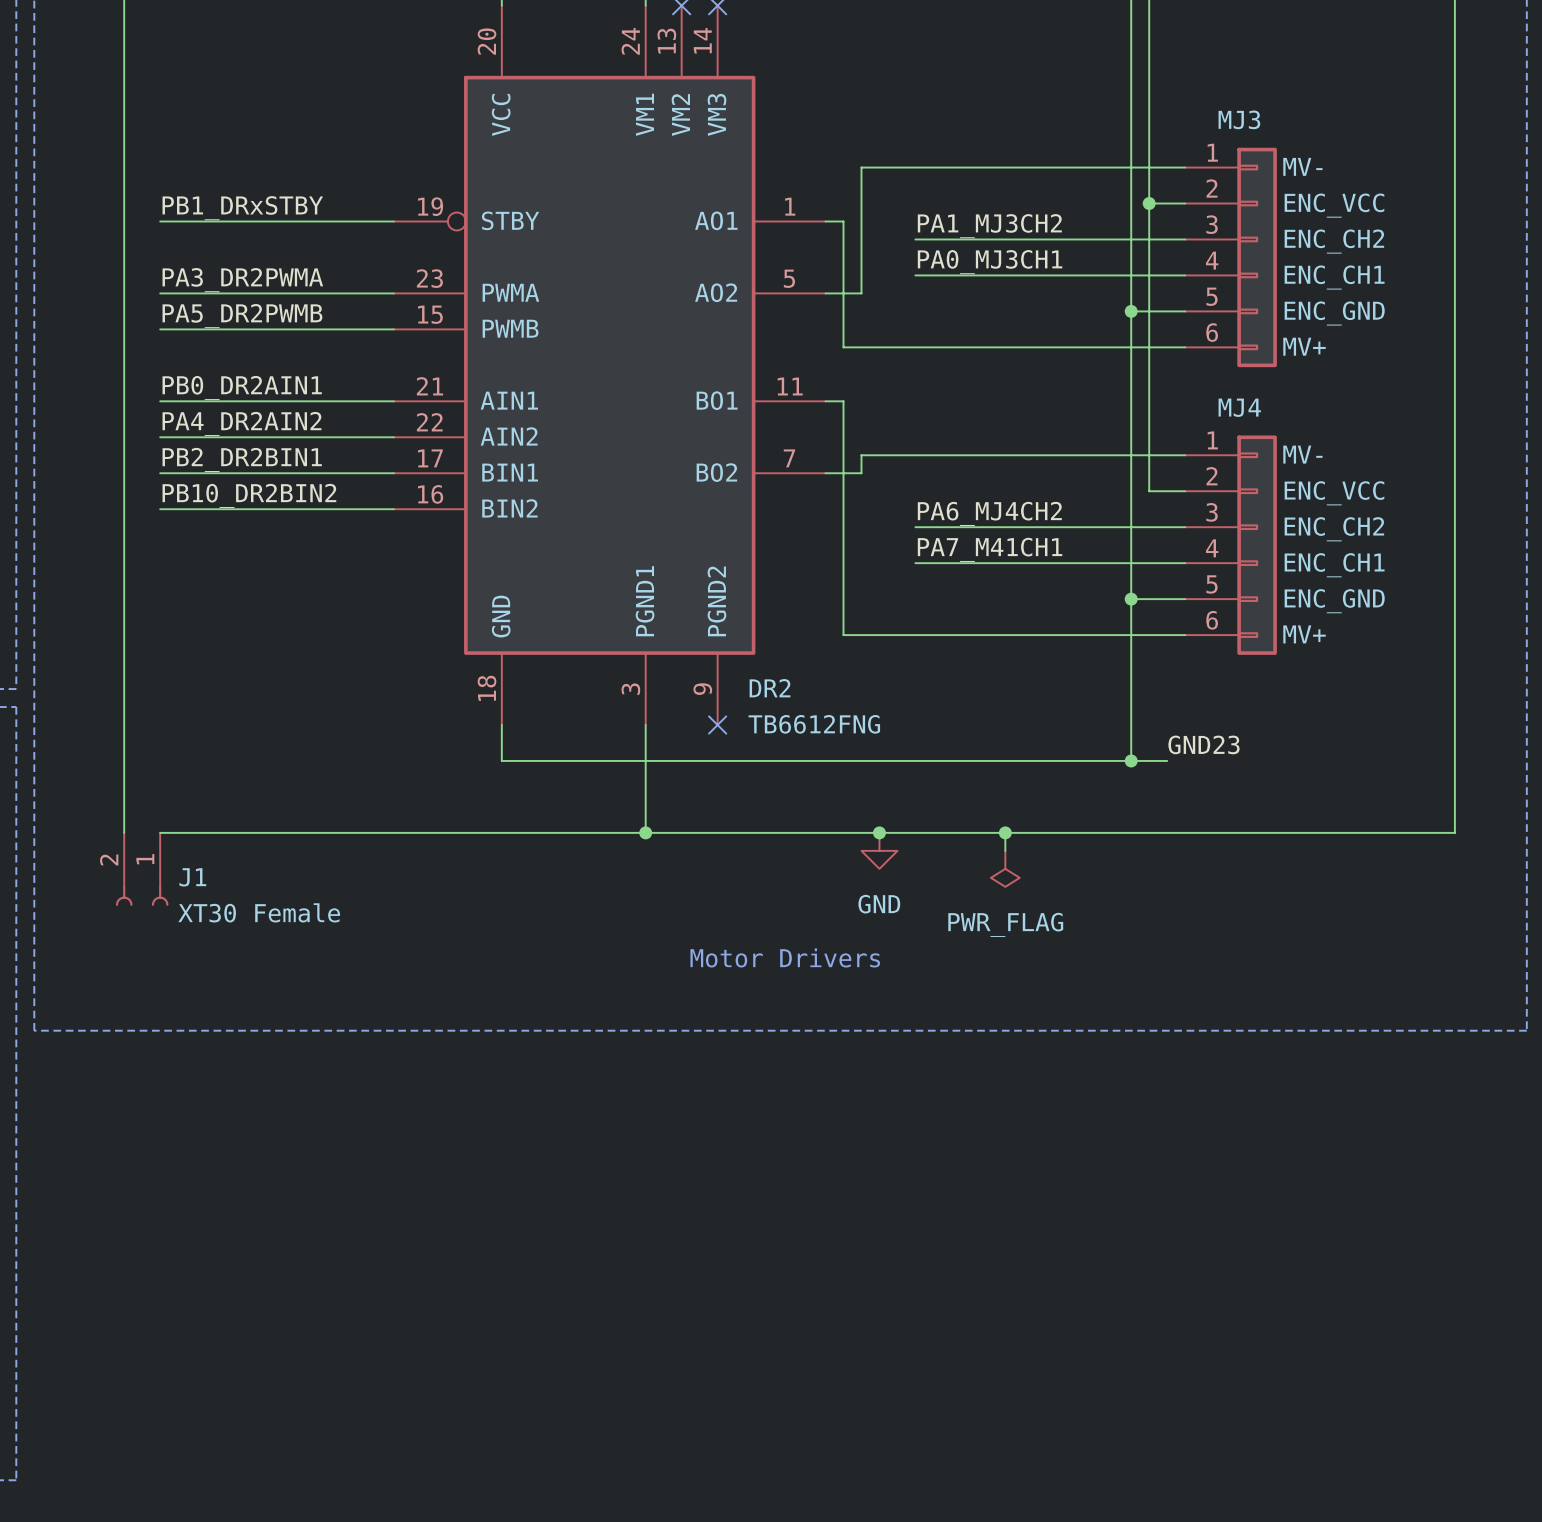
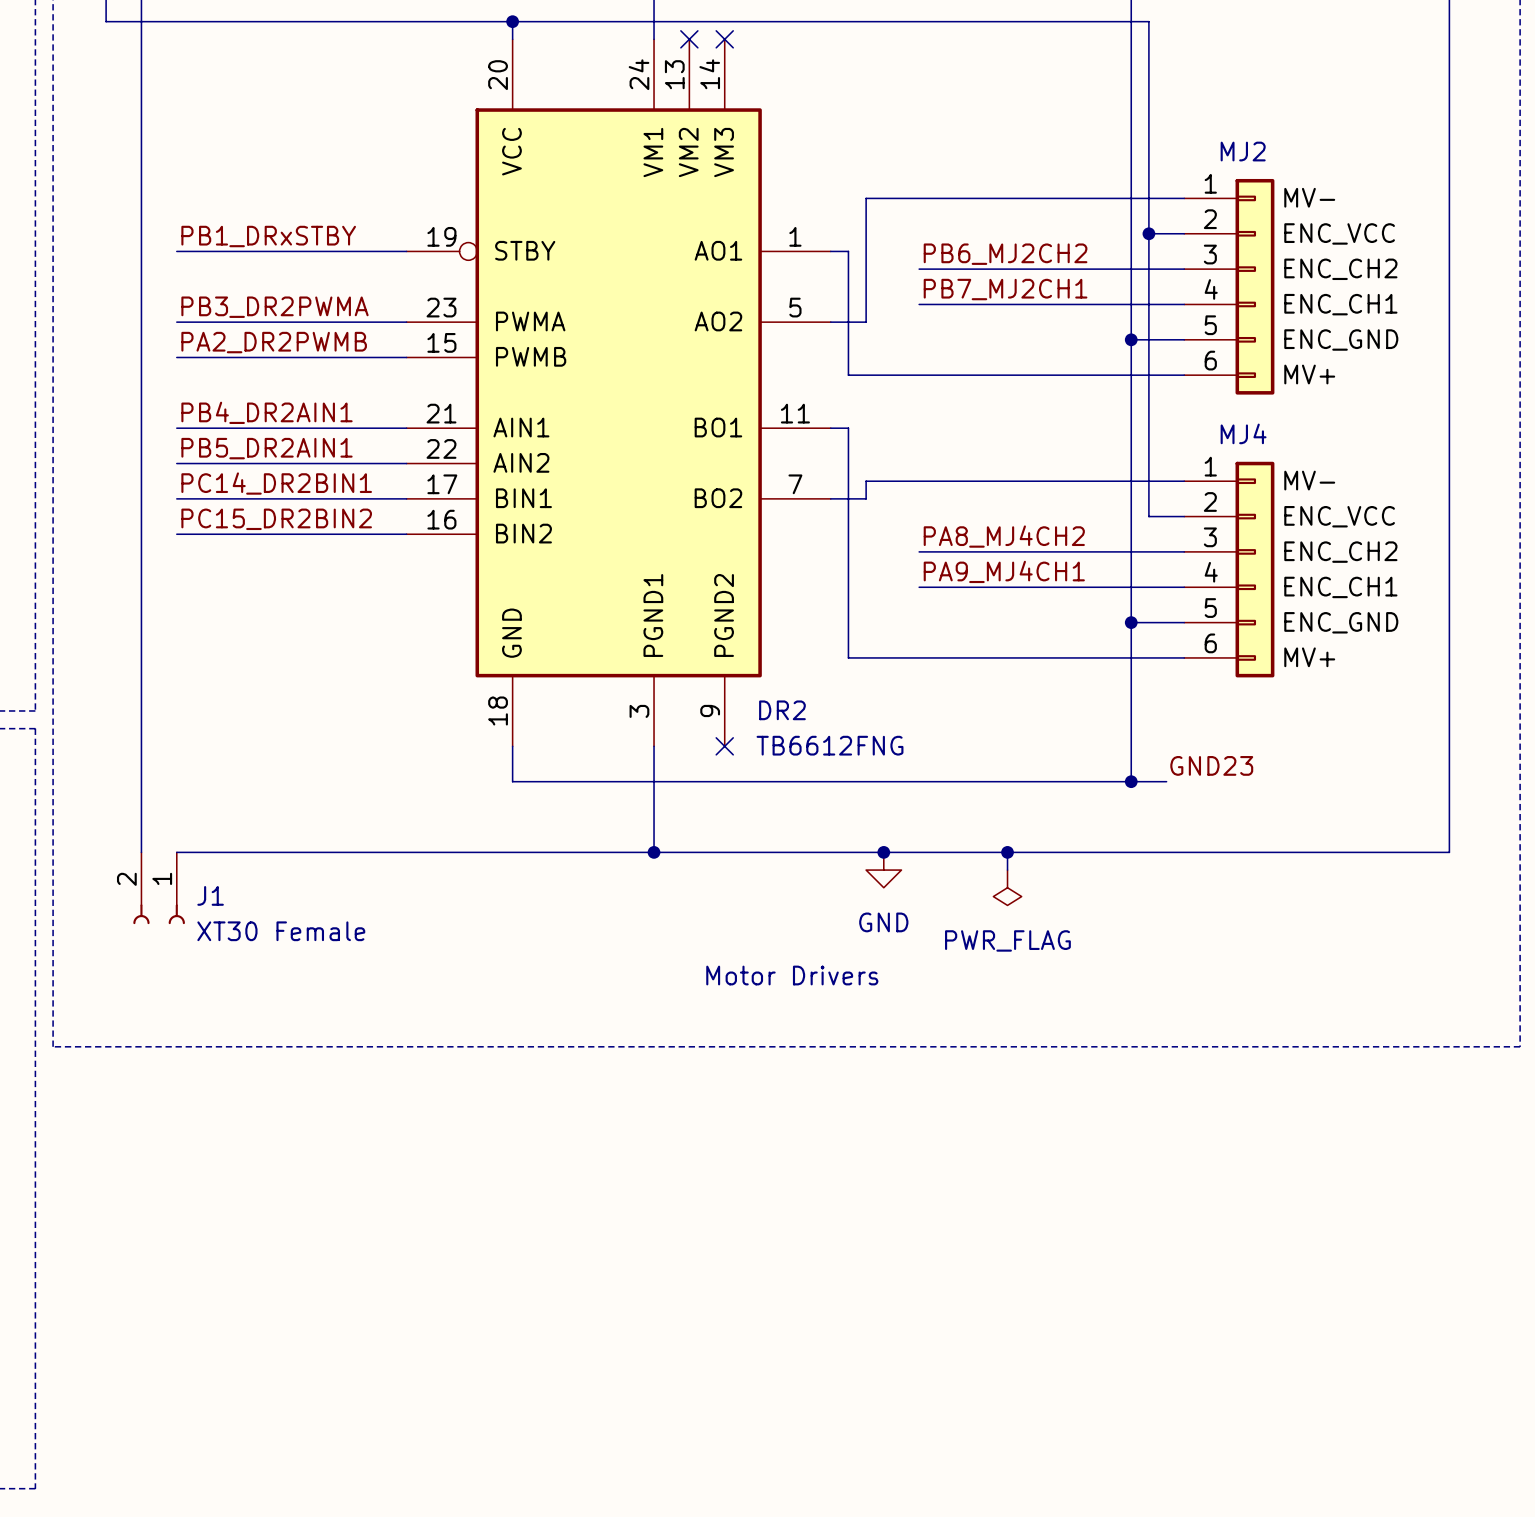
MJ3 name: MJ3 (1239, 119) -> MJ2 (1243, 151)
label: PA1_MJ3CH2 (989, 226) -> PB6_MJ2CH2 (1005, 254)
label: PA0_MJ3CH1 (990, 262) -> PB7_MJ2CH1 (1005, 289)
label: PA3_DR2PWMA (242, 280) -> PB3_DR2PWMA (274, 307)
label: PA5_DR2PWMB (242, 316) -> PA2_DR2PWMB (274, 342)
label: PB0_DR2AIN1 (242, 388) -> PB4_DR2AIN1 (266, 412)
label: PA4_DR2AIN2 (241, 423) -> PB5_DR2AIN1 (266, 448)
label: PB2_DR2BIN1 (242, 459) -> PC14_DR2BIN1 (276, 483)
label: PB10_DR2BIN2 (249, 495) -> PC15_DR2BIN2 (276, 519)
label: PA6_MJ4CH2 (989, 513) -> PA8_MJ4CH2 (1004, 536)
label: PA7_M41CH1 (990, 549) -> PA9_MJ4CH1 (1004, 571)

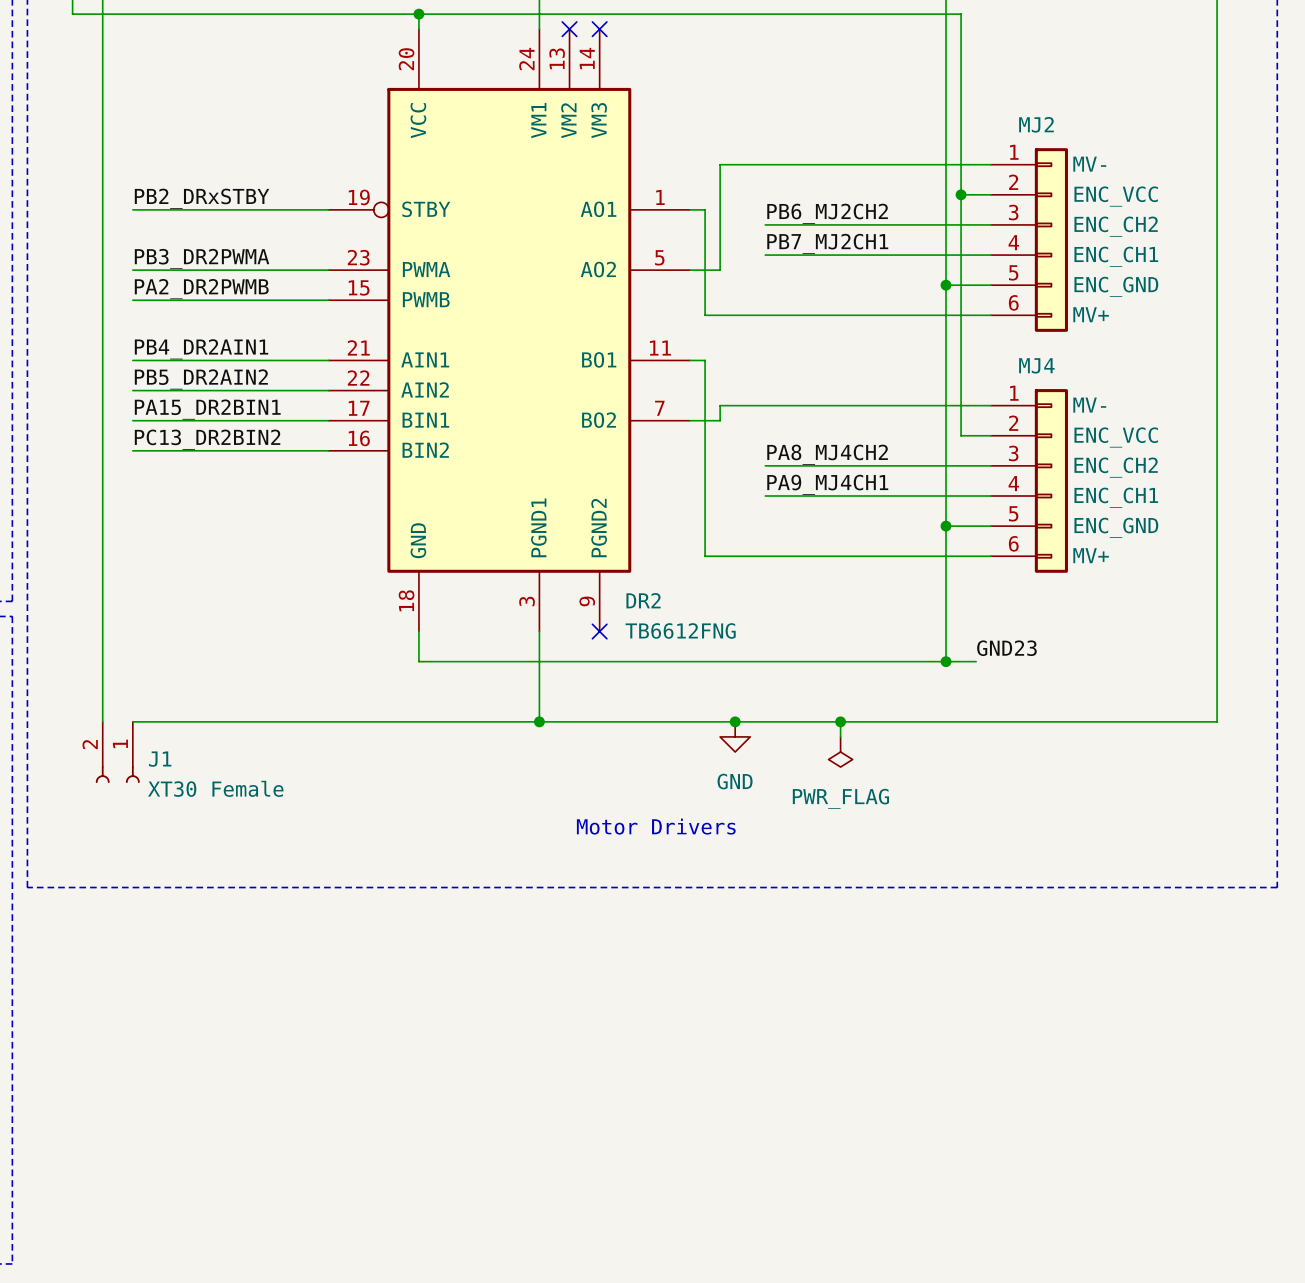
label: PB1_DRxSTBY (268, 236) -> PB2_DRxSTBY (202, 198)
label: PB5_DR2AIN1 (266, 448) -> PB5_DR2AIN2 (201, 379)
label: PC14_DR2BIN1 (276, 483) -> PA15_DR2BIN1 (207, 409)
label: PC15_DR2BIN2 (276, 519) -> PC13_DR2BIN2 (207, 439)

